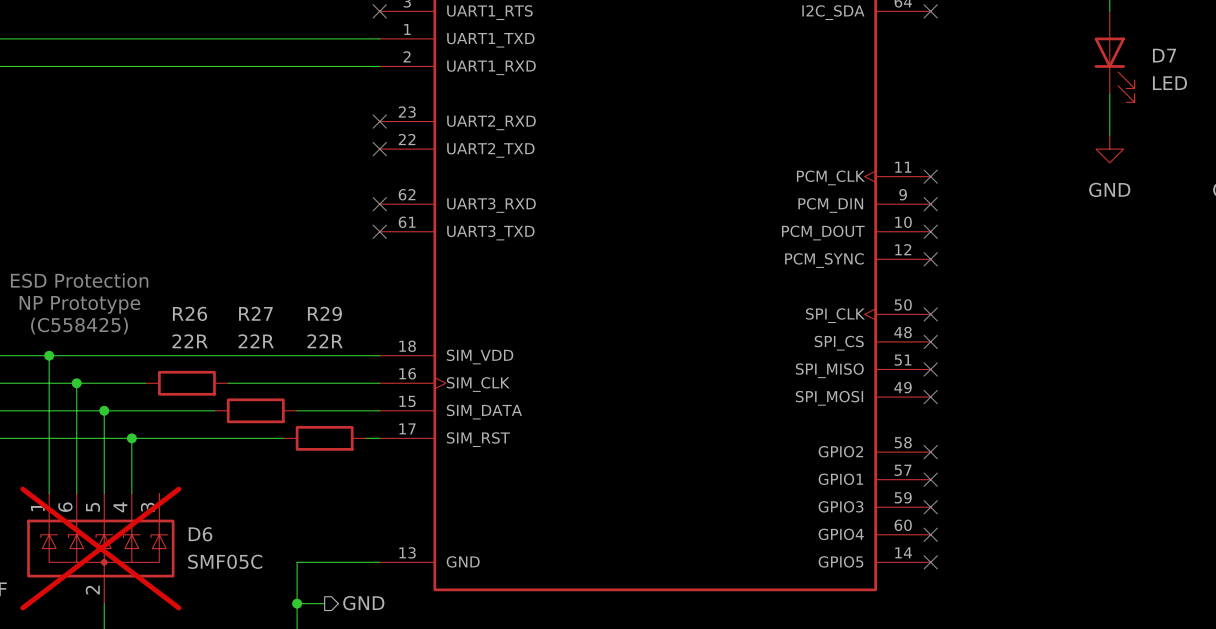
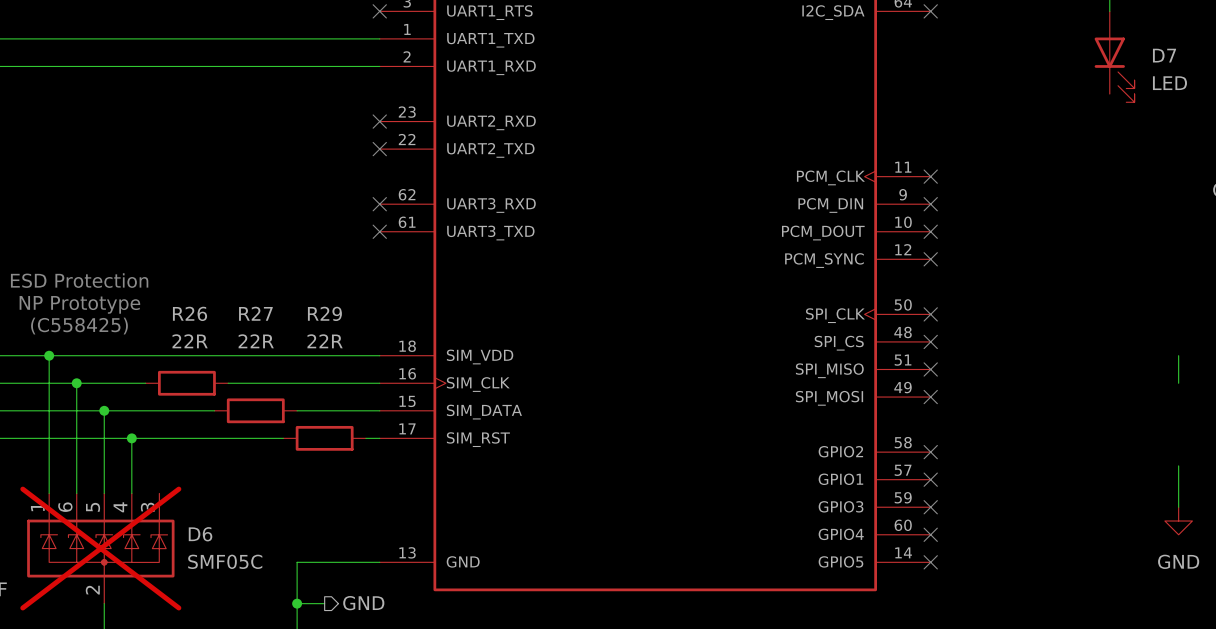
wire: (1109, 94) (1109, 135) -> none
power symbol: GND (1109, 149) -> none
wire: none -> (1178, 355) (1178, 383)
wire: none -> (1178, 465) (1178, 507)
power symbol: none -> GND (1178, 521)

